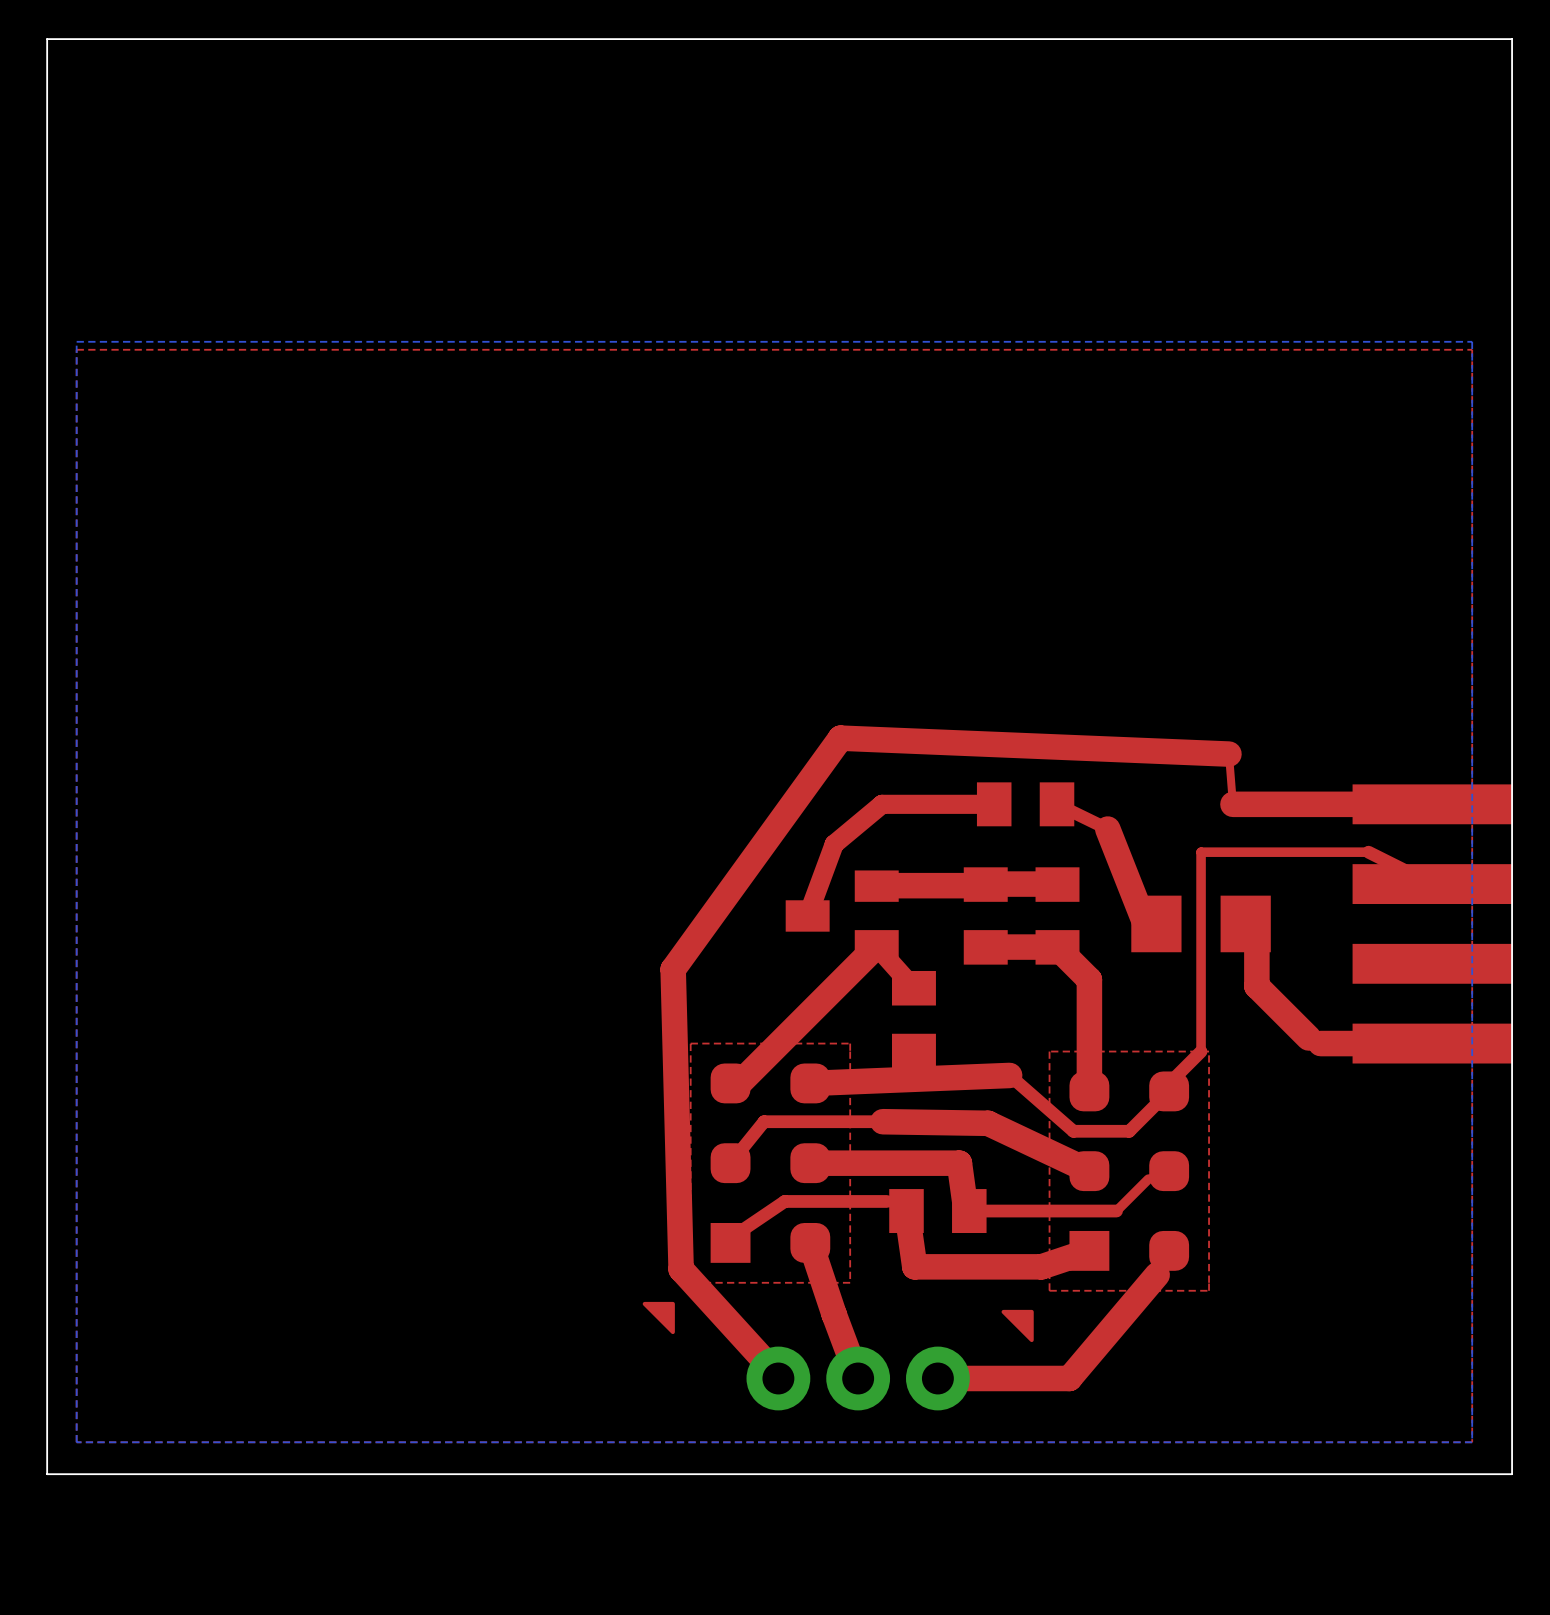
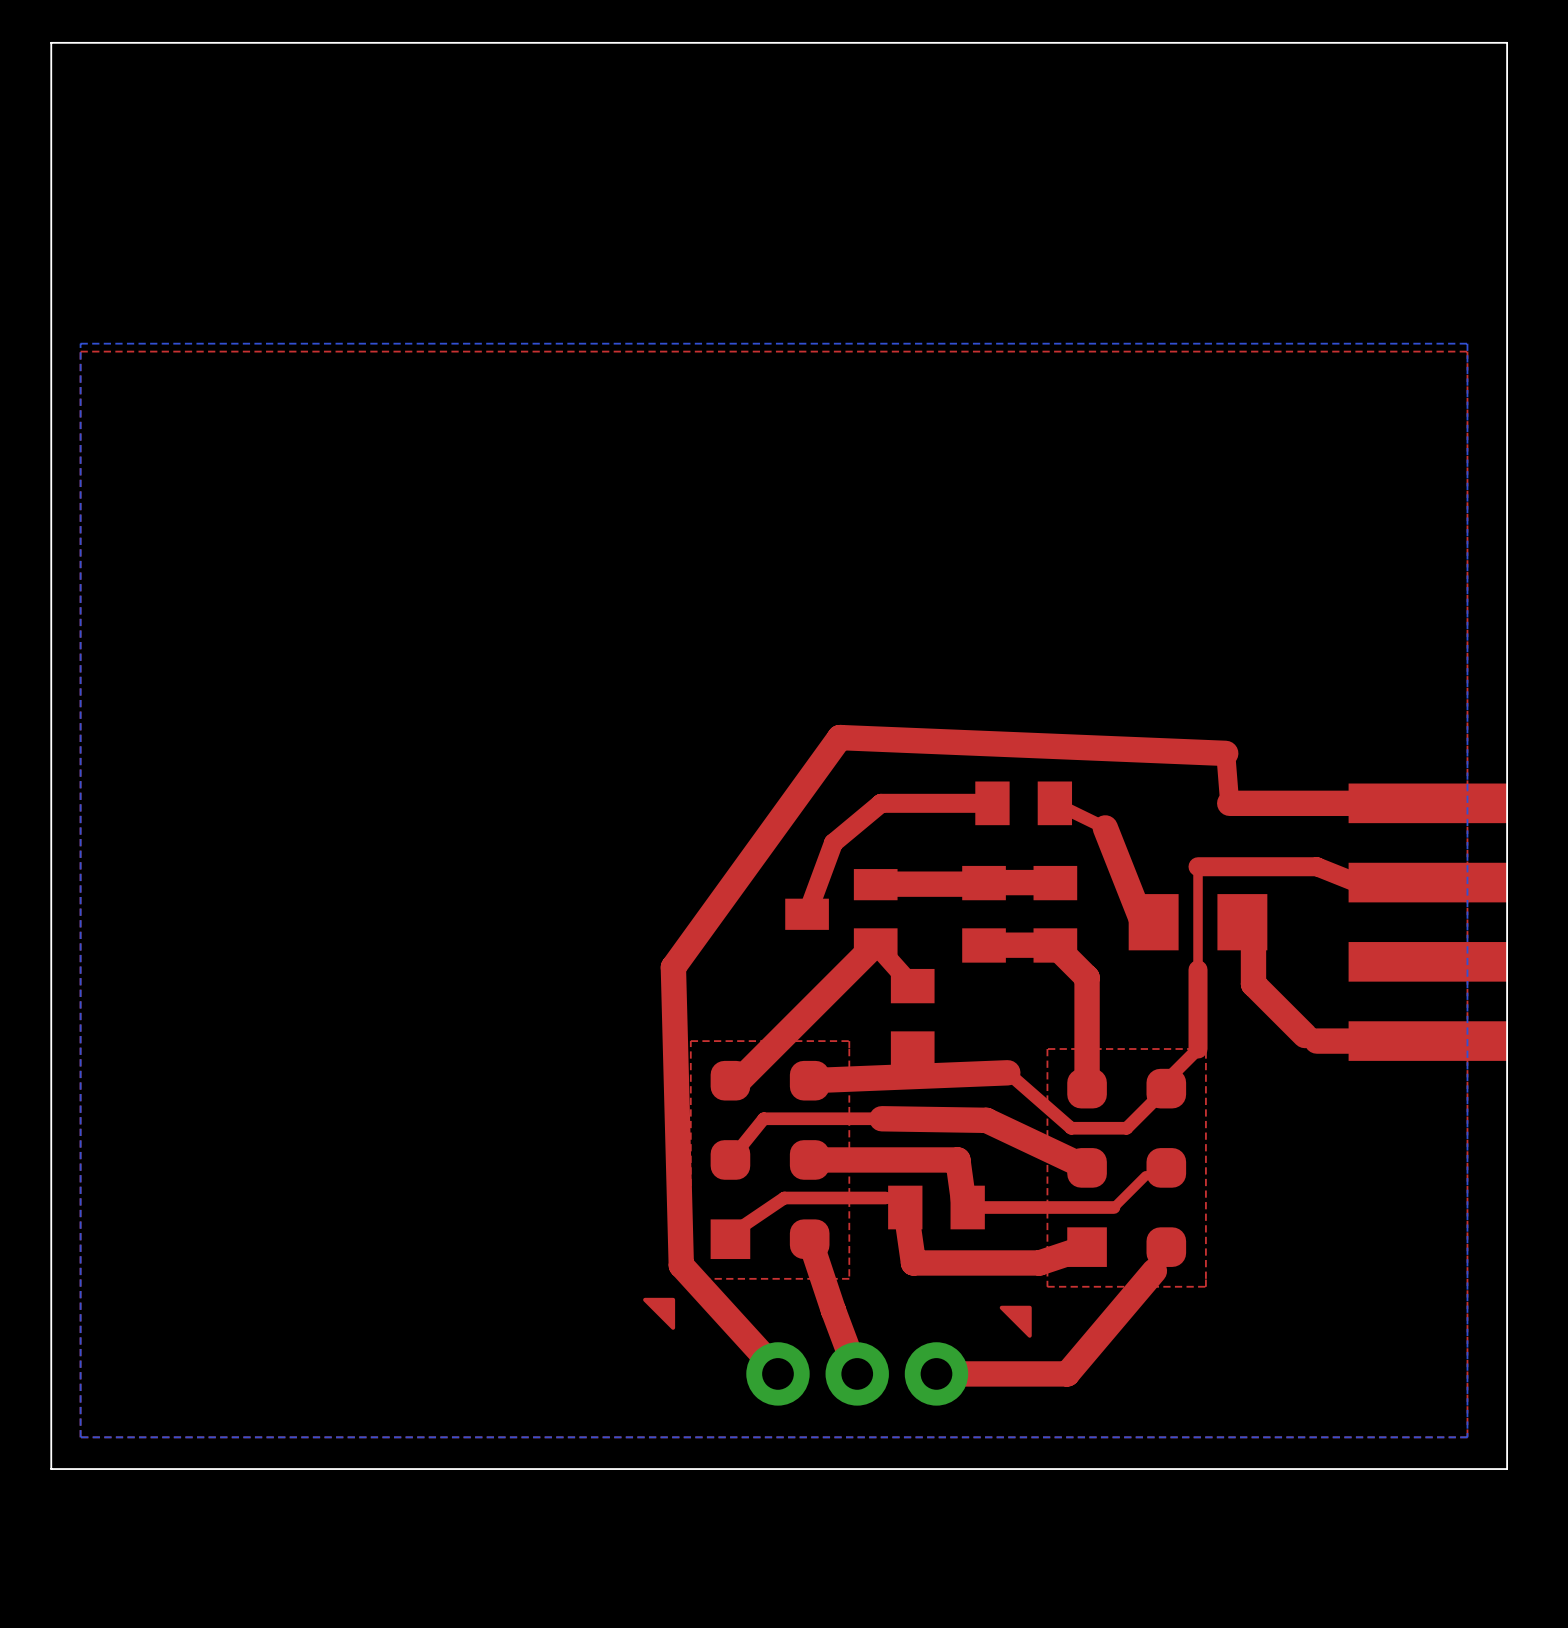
top track width: thin (1228, 754) (1232, 804) -> thick (1225, 753) (1229, 803)
top track: (1201, 868) (1201, 852) (1368, 852) (1432, 884) -> (1198, 866) (1316, 866) (1356, 882) (1427, 882)
top track width: thin (1201, 971) (1201, 1051) -> thick (1198, 969) (1198, 1049)

